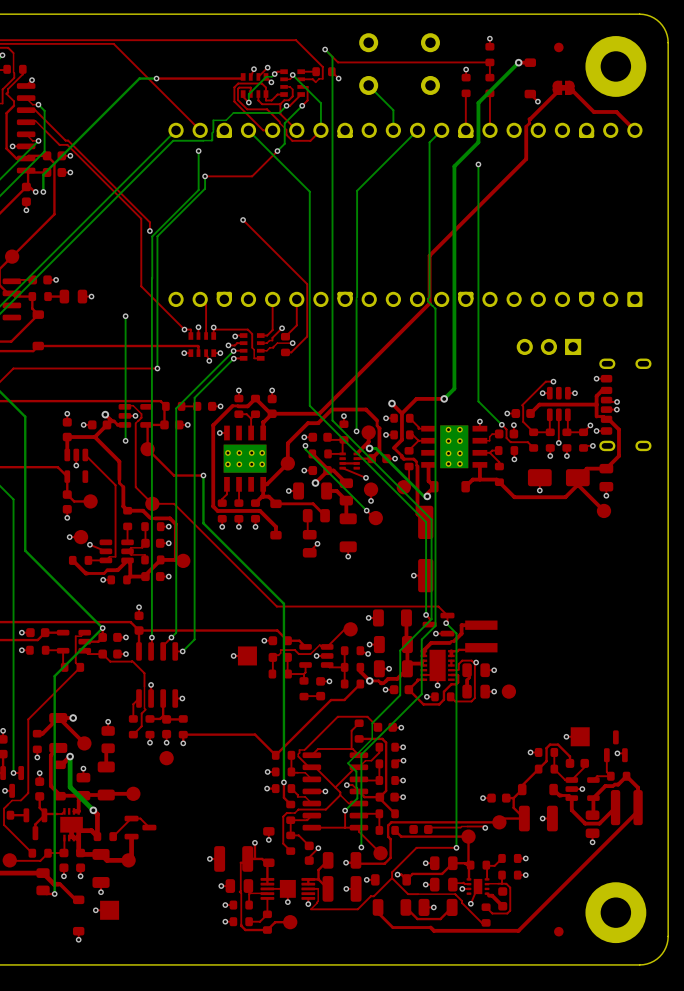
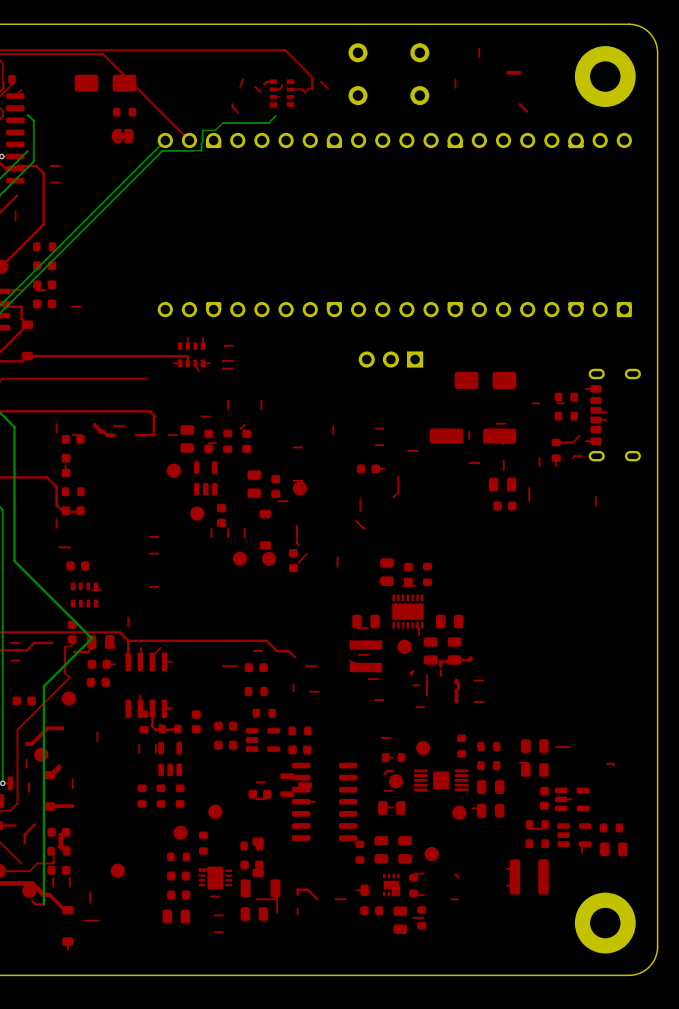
via: (489, 38) -> none
part: (558, 47) -> none
top track: (325, 49) (338, 62) (489, 62) (489, 77) -> none
bottom track: (325, 49) (332, 56) (332, 420) (431, 519) (431, 619) (400, 650) (400, 695) (372, 723) (372, 738) (347, 763) (356, 771) (357, 798) (345, 810) -> none
via: (325, 49) -> none
part: (489, 54) -> none
bottom track: (518, 62) (478, 102) (478, 142) (454, 166) (454, 388) (444, 398) -> none
via: (518, 62) -> none
top track: (267, 67) (258, 76) -> none
via: (267, 67) -> none
via: (253, 69) -> none
via: (466, 69) -> none
top track: (316, 71) (301, 71) -> none
part: (323, 71) -> none
part: none -> (105, 83)
bottom track: (274, 74) (271, 76) (266, 76) (248, 94) (248, 102) -> none
via: (274, 74) -> none
bottom track: (292, 75) (320, 103) (320, 130) -> none
via: (292, 75) -> none
top track: (243, 76) (241, 78) (156, 78) -> none
bottom track: (156, 78) (139, 78) (43, 174) (43, 191) -> none
via: (156, 78) -> none
via: (338, 78) -> none
part: (530, 78) -> none
via: (32, 80) -> none
via: (271, 82) -> none
part: (254, 85) -> none
bottom track: (368, 85) (393, 110) (393, 130) -> none
part: (466, 85) -> none
part: (489, 85) -> none
top track: (301, 86) (307, 86) (307, 100) (302, 105) -> none
top track: (290, 87) (292, 89) (292, 96) (280, 104) -> none
top track: (557, 87) (557, 91) (529, 119) (529, 123) (526, 126) (526, 159) (429, 255) (429, 303) (319, 413) (270, 413) (255, 398) (247, 406) (232, 405) (213, 425) (213, 506) (217, 510) (260, 510) (275, 526) (275, 535) -> none
part: (563, 87) -> none
top track: (569, 87) (593, 111) (616, 111) (634, 130) -> none
top track: (466, 93) (465, 130) -> none
top track: (489, 93) (489, 130) -> none
top track: (250, 94) (250, 87) (239, 87) (237, 100) (247, 109) (267, 109) (286, 129) (286, 134) (292, 140) (310, 140) (320, 130) -> none
top track: (258, 94) (258, 100) (262, 104) (280, 104) -> none
top track: (284, 94) (277, 94) (271, 100) (265, 100) (265, 87) (261, 83) (238, 83) (234, 87) (234, 101) (263, 130) (272, 130) -> none
top track: (301, 94) (289, 105) (286, 105) -> none
top track: (26, 98) (32, 104) (38, 104) -> none
via: (537, 101) -> none
part: none -> (124, 112)
via: (248, 102) -> none
via: (38, 104) -> none
top track: (280, 104) (280, 113) (296, 130) -> none
via: (286, 105) -> none
bottom track: (302, 105) (284, 123) (284, 143) (277, 151) -> none
via: (302, 105) -> none
top track: (26, 110) (35, 110) (65, 140) (68, 140) (149, 222) (149, 231) -> none
top track: (26, 122) (35, 120) (59, 144) (67, 144) (141, 218) (141, 286) (184, 329) (190, 329) (190, 336) -> none
part: none -> (123, 136)
bottom track: (248, 130) (309, 191) (309, 405) (426, 522) (426, 614) -> none
bottom track: (417, 130) (357, 190) (356, 431) -> none
bottom track: (441, 130) (429, 142) (429, 297) (427, 301) (435, 308) (435, 625) (421, 639) (421, 694) (361, 754) (361, 847) -> none
top track: (26, 134) (32, 140) (38, 140) -> none
via: (38, 140) -> none
bottom track: (198, 151) (198, 190) (152, 236) (151, 637) -> none
via: (198, 151) -> none
top track: (277, 151) (252, 176) (205, 176) -> none
via: (277, 151) -> none
part: (54, 155) -> none
via: (70, 155) -> none
bottom track: (478, 164) (478, 401) (501, 424) -> none
via: (478, 164) -> none
top track: (28, 172) (28, 185) (35, 191) -> none
top track: (47, 172) (28, 172) -> none
part: (54, 172) -> none
via: (70, 172) -> none
bottom track: (205, 176) (205, 188) (157, 236) (157, 368) -> none
via: (205, 176) -> none
via: (35, 191) -> none
via: (43, 191) -> none
part: (26, 194) -> none
via: (26, 210) -> none
top track: (243, 219) (307, 284) (307, 336) (291, 352) (285, 352) -> none
via: (243, 219) -> none
via: (149, 231) -> none
part: none -> (44, 246)
part: none -> (44, 265)
part: none -> (44, 284)
part: (40, 279) -> none
via: (56, 279) -> none
part: none -> (44, 303)
part: (40, 296) -> none
top track: (64, 296) (48, 296) -> none
part: (73, 296) -> none
via: (91, 296) -> none
top track: (200, 299) (206, 305) (206, 336) -> none
top track: (272, 299) (272, 330) (267, 335) (260, 335) -> none
top track: (296, 299) (296, 325) (285, 336) -> none
bottom track: (125, 316) (125, 440) -> none
via: (125, 316) -> none
via: (198, 327) -> none
via: (213, 327) -> none
top track: (282, 328) (272, 337) (272, 340) (260, 343) -> none
via: (282, 328) -> none
via: (184, 329) -> none
top track: (213, 329) (247, 329) (252, 333) (254, 358) (260, 358) -> none
via: (235, 336) -> none
top track: (243, 343) (228, 345) -> none
top track: (292, 343) (277, 343) (266, 350) (260, 350) -> none
via: (292, 343) -> none
part: (285, 344) -> none
via: (228, 345) -> none
part: (252, 346) -> none
part position: (548, 346) -> (390, 359)
bottom track: (233, 351) (176, 408) (176, 632) (171, 637) -> none
via: (233, 351) -> none
via: (184, 353) -> none
via: (220, 353) -> none
bottom track: (233, 358) (194, 397) (194, 639) (182, 651) -> none
via: (233, 358) -> none
via: (209, 360) -> none
via: (157, 368) -> none
via: (596, 378) -> none
top track: (553, 381) (545, 381) (522, 405) (523, 421) (533, 432) (550, 432) -> none
via: (553, 381) -> none
part: none -> (566, 397)
via: (238, 390) -> none
via: (272, 390) -> none
top track: (606, 390) (602, 390) (596, 396) (596, 416) (603, 416) (608, 419) (618, 429) (618, 456) (606, 468) (586, 468) (577, 477) (577, 484) -> none
via: (542, 393) -> none
via: (574, 393) -> none
top track: (444, 398) (416, 398) (401, 413) -> none
via: (444, 398) -> none
via: (617, 401) -> none
top track: (391, 403) (401, 413) -> none
via: (391, 403) -> none
part: (558, 404) -> none
top track: (596, 404) (539, 404) (530, 413) -> none
part: none -> (566, 416)
top track: (124, 406) (133, 405) (141, 413) (141, 417) (135, 423) (135, 487) (152, 503) (174, 503) (276, 606) (438, 606) (447, 615) (446, 623) -> none
part: (173, 406) -> none
top track: (197, 406) (181, 406) -> none
part rotation: 0° (204, 406) -> 90° clockwise (246, 441)
part position: (204, 406) -> (246, 441)
via: (220, 406) -> none
part: (238, 406) -> none
part: (255, 406) -> none
part: (272, 406) -> none
via: (616, 409) -> none
via: (67, 413) -> none
top track: (272, 413) (263, 422) (263, 432) -> none
top track: (401, 413) (401, 439) (393, 447) (403, 459) (413, 459) (416, 461) (417, 514) (425, 522) -> none
via: (507, 413) -> none
part: (523, 413) -> none
via: (105, 414) -> none
top track: (238, 414) (246, 414) (251, 418) (251, 432) -> none
top track: (549, 414) (549, 432) -> none
top track: (558, 414) (558, 442) -> none
top track: (567, 414) (567, 432) -> none
part: (135, 415) -> none
via: (135, 415) -> none
via: (343, 416) -> none
via: (386, 418) -> none
part: (401, 418) -> none
top track: (409, 418) (418, 428) (428, 428) -> none
top track: (110, 421) (94, 437) -> none
via: (479, 421) -> none
via: (83, 424) -> none
part: (99, 424) -> none
top track: (147, 424) (147, 449) (173, 475) (203, 475) -> none
part: (171, 424) -> none
via: (187, 424) -> none
top track: (501, 424) (506, 429) (506, 438) (510, 442) (527, 442) (533, 447) -> none
via: (501, 424) -> none
via: (513, 425) -> none
via: (590, 425) -> none
part: none -> (187, 438)
top track: (379, 428) (377, 425) (377, 420) (366, 409) (331, 409) (318, 423) (307, 423) (287, 443) (287, 463) (266, 484) (263, 484) (263, 496) -> none
top track: (379, 428) (379, 450) (371, 458) (356, 458) -> none
part: (67, 429) -> none
part: none -> (73, 439)
part: none -> (208, 441)
part: none -> (227, 441)
via: (356, 431) -> none
via: (596, 431) -> none
via: (219, 432) -> none
part: (343, 432) -> none
top track: (368, 432) (368, 441) (356, 453) -> none
part: (368, 432) -> none
top track: (499, 433) (492, 434) (489, 440) (479, 440) -> none
part: (506, 433) -> none
via: (386, 434) -> none
part: (401, 434) -> none
top track: (409, 434) (412, 434) (418, 440) (409, 450) -> none
top track: (94, 437) (119, 461) (119, 483) (123, 486) (123, 506) (127, 510) (143, 510) (150, 518) (170, 518) (175, 524) (175, 559) -> none
top track: (94, 437) (67, 437) (67, 454) -> none
via: (304, 437) -> none
part: (320, 437) -> none
top track: (327, 437) (330, 439) (343, 439) (342, 453) (328, 453) -> none
via: (125, 440) -> none
part: (533, 440) -> none
part: (550, 440) -> none
part: (583, 440) -> none
via: (558, 442) -> none
bottom track: (305, 445) (305, 449) (366, 510) -> none
via: (305, 445) -> none
via: (592, 445) -> none
part: (454, 446) -> none
bottom track: (369, 448) (376, 448) (425, 498) (427, 496) -> none
via: (369, 448) -> none
part: (147, 449) -> none
top track: (498, 450) (492, 450) (489, 452) (499, 462) (499, 466) -> none
part: (506, 450) -> none
top track: (312, 453) (327, 469) (315, 483) -> none
part: (320, 453) -> none
top track: (85, 454) (115, 485) (115, 556) (109, 556) (105, 560) (88, 560) -> none
part: none -> (66, 465)
via: (550, 456) -> none
via: (566, 456) -> none
part: (245, 458) -> none
via: (395, 458) -> none
part: (409, 458) -> none
via: (514, 459) -> none
part: none -> (173, 470)
part: (349, 461) -> none
part position: (287, 463) -> (299, 488)
top track: (356, 463) (342, 463) -> none
top track: (428, 464) (428, 481) (434, 486) (427, 493) (427, 496) -> none
top track: (479, 464) (479, 479) -> none
part: (76, 465) -> none
via: (76, 465) -> none
part: none -> (205, 478)
top track: (342, 468) (366, 477) -> none
via: (304, 470) -> none
part: (320, 470) -> none
top track: (327, 470) (333, 470) (346, 483) -> none
part: none -> (254, 484)
part: (499, 474) -> none
bottom track: (203, 475) (203, 523) (283, 603) (283, 782) -> none
via: (203, 475) -> none
part: none -> (275, 486)
via: (366, 477) -> none
part position: (558, 477) -> (485, 380)
part rotation: 0° (606, 477) -> 90° clockwise (502, 484)
part position: (606, 477) -> (502, 484)
part: none -> (73, 491)
via: (315, 483) -> none
top track: (226, 484) (226, 494) (222, 499) (222, 503) -> none
top track: (239, 484) (238, 503) -> none
top track: (577, 484) (603, 510) -> none
top track: (577, 484) (565, 497) (514, 497) (496, 479) (472, 479) (465, 486) -> none
part: (449, 486) -> none
part: (403, 487) -> none
part: (371, 489) -> none
via: (288, 490) -> none
part: (312, 490) -> none
top track: (326, 490) (336, 490) (346, 500) (346, 516) (348, 518) -> none
via: (539, 490) -> none
part: (346, 491) -> none
part footprint: [83, 494, 98, 509] -> [61, 506, 85, 516]
part: none -> (504, 505)
via: (606, 495) -> none
via: (427, 496) -> none
via: (371, 500) -> none
part: (67, 501) -> none
part: (152, 503) -> none
part: none -> (197, 513)
top track: (255, 503) (262, 496) (268, 496) (275, 503) (313, 503) (325, 515) -> none
part: none -> (221, 515)
part: (222, 510) -> none
part: (238, 510) -> none
part: (255, 510) -> none
via: (366, 510) -> none
part: (603, 510) -> none
part: (316, 515) -> none
via: (67, 517) -> none
part: (127, 518) -> none
part: (375, 518) -> none
top track: (127, 526) (127, 542) -> none
top track: (145, 526) (145, 543) (142, 547) (131, 547) (127, 551) (131, 554) (145, 554) (145, 559) -> none
part: (152, 526) -> none
via: (168, 526) -> none
via: (222, 526) -> none
via: (238, 526) -> none
via: (255, 526) -> none
part footprint: [302, 529, 317, 558] -> [288, 549, 298, 573]
part: (348, 532) -> none
via: (69, 537) -> none
part: (81, 537) -> none
part: (152, 543) -> none
via: (168, 543) -> none
via: (317, 543) -> none
top track: (89, 544) (105, 551) -> none
via: (89, 544) -> none
part: none -> (240, 558)
part: none -> (269, 558)
part rotation: 0° (425, 548) -> 90° clockwise (473, 436)
part position: (425, 548) -> (473, 436)
part: (116, 551) -> none
part footprint: [68, 555, 93, 565] -> [66, 561, 90, 571]
via: (348, 556) -> none
part: (152, 559) -> none
top track: (72, 560) (85, 573) (104, 573) (107, 570) (117, 570) (127, 560) (130, 563) (130, 576) -> none
top track: (183, 560) (160, 559) (144, 576) -> none
part: (183, 560) -> none
part: none -> (387, 572)
part: none -> (408, 574)
part: none -> (427, 574)
via: (413, 575) -> none
top track: (145, 576) (130, 576) -> none
part: (152, 576) -> none
via: (168, 576) -> none
via: (103, 579) -> none
part: (119, 579) -> none
part: none -> (84, 594)
via: (139, 607) -> none
part: none -> (366, 621)
part: none -> (449, 621)
via: (426, 614) -> none
via: (368, 617) -> none
part: (392, 617) -> none
top track: (406, 617) (407, 668) (397, 678) (388, 678) (381, 683) (378, 680) (369, 680) (360, 671) (360, 667) -> none
part: none -> (72, 632)
part: (139, 623) -> none
bottom track: (446, 623) (456, 633) (456, 847) -> none
via: (446, 623) -> none
part: (438, 624) -> none
top track: (481, 625) (461, 625) (461, 633) (454, 641) (431, 642) (423, 650) (423, 655) -> none
via: (102, 628) -> none
top track: (350, 629) (344, 629) (327, 646) (319, 645) (310, 654) (298, 654) (294, 650) (280, 650) (278, 655) (272, 657) (272, 674) -> none
part: (350, 629) -> none
via: (21, 632) -> none
part: (37, 632) -> none
part footprint: [98, 632, 122, 642] -> [86, 635, 115, 649]
via: (435, 633) -> none
part: none -> (404, 646)
part position: (481, 636) -> (366, 656)
via: (125, 637) -> none
via: (151, 637) -> none
via: (171, 637) -> none
via: (264, 640) -> none
part: (280, 640) -> none
part: none -> (430, 651)
part: none -> (454, 651)
part: (73, 641) -> none
via: (369, 644) -> none
part: (393, 644) -> none
via: (21, 650) -> none
part: (37, 650) -> none
top track: (45, 650) (62, 650) (64, 667) -> none
top track: (84, 650) (88, 654) (102, 654) (110, 661) (132, 661) (144, 673) (145, 709) (141, 713) (141, 726) (133, 734) -> none
top track: (344, 650) (344, 684) -> none
part: (352, 650) -> none
via: (182, 651) -> none
via: (368, 653) -> none
via: (125, 654) -> none
via: (233, 655) -> none
part: (247, 655) -> none
part: (316, 655) -> none
via: (316, 655) -> none
part: none -> (256, 667)
part: (280, 657) -> none
top track: (287, 657) (288, 674) (304, 674) (305, 664) -> none
via: (476, 662) -> none
top track: (407, 663) (421, 663) (423, 665) -> none
top track: (474, 663) (471, 660) (462, 660) (458, 664) (458, 669) (451, 670) -> none
top track: (474, 663) (474, 698) (471, 701) (455, 701) (450, 696) -> none
top track: (327, 664) (329, 667) (344, 667) -> none
part rotation: 0° (437, 665) -> 90° clockwise (407, 611)
part position: (437, 665) -> (407, 611)
part: (72, 667) -> none
part: (352, 667) -> none
via: (389, 668) -> none
part: (393, 668) -> none
part: (476, 670) -> none
via: (494, 670) -> none
part: none -> (98, 682)
part: (280, 674) -> none
top track: (451, 674) (458, 675) (458, 682) (451, 684) (443, 691) (443, 699) (439, 704) (423, 704) (408, 689) (417, 679) (423, 679) -> none
via: (369, 680) -> none
part: none -> (256, 691)
via: (329, 681) -> none
via: (151, 684) -> none
part: (352, 684) -> none
top track: (360, 684) (344, 700) (331, 700) (275, 755) (255, 734) (183, 734) (183, 743) -> none
via: (437, 685) -> none
part: none -> (68, 698)
part: (304, 688) -> none
part: (320, 688) -> none
via: (385, 689) -> none
part: (401, 689) -> none
part: none -> (24, 700)
part: (476, 691) -> none
via: (494, 691) -> none
part: (508, 691) -> none
top track: (320, 696) (304, 696) -> none
via: (426, 696) -> none
part: (442, 696) -> none
top track: (139, 698) (133, 704) (133, 718) -> none
via: (182, 698) -> none
part: none -> (264, 713)
part: none -> (144, 721)
part: none -> (196, 721)
top track: (163, 715) (160, 718) (149, 718) -> none
part: none -> (225, 726)
top track: (58, 717) (84, 743) -> none
via: (73, 717) -> none
part: none -> (299, 730)
via: (108, 721) -> none
top track: (359, 723) (351, 730) (351, 748) -> none
part: (133, 726) -> none
part: (149, 726) -> none
part: (166, 726) -> none
part rotation: 0° (183, 726) -> 90° clockwise (170, 729)
top track: (377, 727) (367, 716) (337, 716) (304, 749) (299, 749) (298, 756) (309, 767) (315, 767) (335, 787) -> none
part: (385, 727) -> none
via: (401, 727) -> none
part: none -> (262, 739)
part: (359, 731) -> none
part: (58, 732) -> none
part: none -> (225, 745)
part: none -> (461, 746)
part: none -> (534, 746)
part: none -> (488, 746)
via: (566, 736) -> none
part: (580, 736) -> none
part: none -> (423, 748)
top track: (359, 738) (382, 738) (386, 742) (386, 790) (379, 797) -> none
part: (108, 739) -> none
part: none -> (299, 749)
part: (37, 741) -> none
via: (149, 742) -> none
via: (166, 742) -> none
part: (84, 743) -> none
via: (183, 743) -> none
part: none -> (41, 754)
part: (615, 746) -> none
top track: (58, 747) (50, 755) (50, 785) (60, 796) -> none
top track: (379, 747) (379, 752) (371, 760) (365, 760) (358, 767) (355, 767) (335, 787) -> none
part: (387, 747) -> none
via: (403, 747) -> none
part: none -> (393, 757)
top track: (108, 748) (106, 750) (106, 766) -> none
part: none -> (170, 758)
via: (530, 752) -> none
part: (546, 752) -> none
top track: (554, 752) (554, 769) (565, 780) (571, 780) (584, 767) (584, 763) -> none
via: (617, 753) -> none
part: (283, 755) -> none
top track: (291, 755) (291, 771) (305, 772) (311, 779) -> none
top track: (358, 755) (352, 748) (318, 748) (311, 755) -> none
part: none -> (488, 765)
top track: (606, 755) (606, 772) (610, 776) (597, 776) (593, 780) -> none
bottom track: (70, 756) (70, 787) (93, 810) -> none
via: (70, 756) -> none
via: (37, 757) -> none
part: (166, 758) -> none
part: none -> (534, 769)
via: (403, 760) -> none
top track: (379, 763) (379, 780) (358, 779) -> none
part: (387, 763) -> none
top track: (570, 763) (570, 756) (558, 744) (549, 744) (546, 748) (546, 761) (522, 785) (522, 789) (513, 798) (513, 807) (524, 818) (503, 818) (499, 822) (391, 822) (388, 825) (390, 857) (384, 863) (359, 863) (355, 860) (353, 862) (346, 862) -> none
part rotation: 0° (577, 763) -> 90° clockwise (544, 798)
part position: (577, 763) -> (544, 798)
via: (83, 768) -> none
part: (546, 769) -> none
via: (267, 771) -> none
part: (283, 771) -> none
part: none -> (396, 781)
via: (39, 773) -> none
part: none -> (296, 785)
part: none -> (490, 787)
part: (618, 776) -> none
part: (106, 780) -> none
part: (387, 780) -> none
via: (403, 780) -> none
top track: (283, 782) (283, 797) (290, 804) -> none
via: (283, 782) -> none
part: none -> (260, 794)
part: none -> (142, 796)
part: none -> (161, 796)
part: none -> (180, 796)
top track: (346, 785) (352, 785) (364, 797) (379, 797) -> none
via: (346, 785) -> none
part: (83, 786) -> none
top track: (335, 787) (340, 795) -> none
via: (267, 788) -> none
part: (283, 788) -> none
top track: (291, 788) (297, 796) (305, 796) (311, 803) -> none
part: (39, 789) -> none
part: (537, 789) -> none
top track: (553, 789) (559, 795) (569, 795) (571, 798) (571, 810) (585, 823) (599, 823) (615, 807) -> none
via: (582, 789) -> none
via: (325, 791) -> none
top track: (133, 793) (84, 795) (78, 800) (78, 811) (73, 811) -> none
part: (133, 793) -> none
part footprint: [487, 793, 511, 803] -> [476, 803, 505, 818]
top track: (340, 795) (325, 809) (298, 809) (294, 813) (286, 813) (283, 816) (283, 843) (290, 851) -> none
top track: (340, 795) (348, 803) (358, 803) -> none
top track: (39, 796) (39, 807) (45, 813) (61, 813) (64, 811) -> none
top track: (379, 797) (395, 813) -> none
part: (387, 797) -> none
part: none -> (391, 807)
via: (403, 797) -> none
via: (483, 798) -> none
part: none -> (215, 811)
part: none -> (459, 812)
part: (626, 807) -> none
part footprint: [60, 808, 83, 842] -> [47, 827, 71, 837]
top track: (93, 810) (97, 814) (97, 836) (91, 830) (78, 830) (78, 851) (82, 854) (101, 854) (106, 860) (128, 860) (131, 857) (131, 836) -> none
via: (93, 810) -> none
top track: (345, 810) (345, 827) -> none
via: (345, 810) -> none
part footprint: [585, 810, 600, 839] -> [557, 823, 592, 847]
part: (290, 812) -> none
part: (387, 813) -> none
part: none -> (537, 824)
top track: (311, 815) (307, 820) (290, 820) (290, 835) (298, 835) (309, 845) -> none
top track: (358, 815) (360, 813) (379, 813) (379, 830) -> none
top track: (592, 815) (593, 798) (605, 786) (618, 784) (626, 776) (638, 787) (638, 811) (518, 930) (433, 930) (430, 927) (392, 927) (379, 913) (378, 907) -> none
part: none -> (611, 827)
part: (538, 818) -> none
via: (542, 818) -> none
part: none -> (180, 832)
part: (499, 822) -> none
part: (35, 824) -> none
part: (140, 827) -> none
top track: (149, 827) (140, 818) (131, 818) (113, 836) -> none
top track: (311, 827) (358, 827) (358, 831) (380, 853) -> none
top track: (485, 827) (461, 826) (430, 827) (428, 829) -> none
via: (485, 827) -> none
part: (420, 829) -> none
part: (387, 830) -> none
top track: (395, 830) (401, 836) (468, 836) (468, 861) (466, 864) (452, 863) (442, 873) (412, 873) (406, 879) (401, 874) (397, 874) -> none
part: none -> (203, 843)
part: none -> (537, 843)
part: none -> (251, 846)
part: (105, 836) -> none
part: (468, 836) -> none
part: none -> (613, 849)
via: (268, 839) -> none
part: none -> (381, 849)
part: none -> (405, 849)
part: none -> (58, 851)
part: none -> (359, 852)
top track: (254, 842) (254, 858) -> none
via: (254, 842) -> none
via: (592, 842) -> none
part: (290, 843) -> none
part: none -> (431, 854)
part: none -> (178, 856)
via: (361, 847) -> none
top track: (456, 847) (416, 847) (392, 872) (392, 878) -> none
via: (456, 847) -> none
top track: (318, 848) (309, 857) (309, 860) -> none
via: (318, 848) -> none
part: (40, 853) -> none
part: (309, 853) -> none
part: (380, 853) -> none
part: none -> (251, 865)
via: (209, 858) -> none
part: (233, 858) -> none
top track: (502, 858) (494, 865) (487, 865) -> none
part: (509, 858) -> none
via: (525, 858) -> none
part: none -> (58, 870)
part: (63, 860) -> none
part: (80, 860) -> none
top track: (328, 860) (318, 869) (318, 879) -> none
part: (342, 860) -> none
via: (346, 862) -> none
via: (425, 863) -> none
part: (443, 863) -> none
top track: (267, 864) (267, 884) -> none
top track: (267, 864) (262, 858) (247, 858) (240, 862) (241, 925) (245, 930) (267, 930) (275, 922) (290, 922) -> none
part: none -> (178, 875)
top track: (470, 865) (468, 879) -> none
part: (478, 865) -> none
top track: (487, 865) (487, 879) -> none
part: none -> (529, 876)
part: none -> (215, 877)
part footprint: [36, 868, 50, 896] -> [22, 883, 37, 898]
part: (101, 868) -> none
via: (397, 874) -> none
part: none -> (413, 885)
top track: (502, 875) (502, 883) -> none
part: (509, 875) -> none
via: (525, 875) -> none
via: (63, 876) -> none
via: (80, 876) -> none
part: none -> (260, 888)
top track: (392, 878) (408, 894) (455, 894) (481, 922) (486, 922) -> none
top track: (392, 878) (357, 909) (310, 909) (318, 901) (318, 888) (308, 888) -> none
via: (366, 879) -> none
part: none -> (178, 895)
via: (425, 884) -> none
part: (443, 884) -> none
top track: (468, 884) (452, 884) -> none
top track: (487, 884) (506, 883) (510, 887) (510, 910) (507, 913) (492, 913) (486, 907) -> none
via: (221, 886) -> none
part: (239, 886) -> none
top track: (478, 886) (470, 903) -> none
part rotation: 0° (478, 886) -> 90° clockwise (391, 885)
part position: (478, 886) -> (391, 885)
part position: (287, 888) -> (441, 780)
part: (342, 888) -> none
via: (346, 888) -> none
via: (462, 888) -> none
via: (101, 892) -> none
via: (54, 893) -> none
top track: (249, 893) (249, 905) -> none
top track: (249, 893) (267, 893) -> none
top track: (487, 893) (492, 895) (502, 906) -> none
top track: (267, 898) (267, 914) (260, 921) (249, 921) -> none
part footprint: [418, 898, 458, 916] -> [417, 906, 427, 930]
part: (502, 898) -> none
part: none -> (371, 910)
via: (287, 902) -> none
part: none -> (254, 914)
via: (470, 903) -> none
via: (308, 904) -> none
via: (225, 905) -> none
part: (241, 905) -> none
part: none -> (176, 916)
part: (391, 907) -> none
via: (433, 907) -> none
top track: (452, 907) (440, 919) (417, 919) (405, 907) -> none
part: none -> (400, 920)
via: (95, 910) -> none
part: (109, 910) -> none
part: (486, 915) -> none
via: (225, 921) -> none
part: (241, 921) -> none
part: (267, 922) -> none
part: (290, 922) -> none
part: (558, 931) -> none
via: (78, 939) -> none

